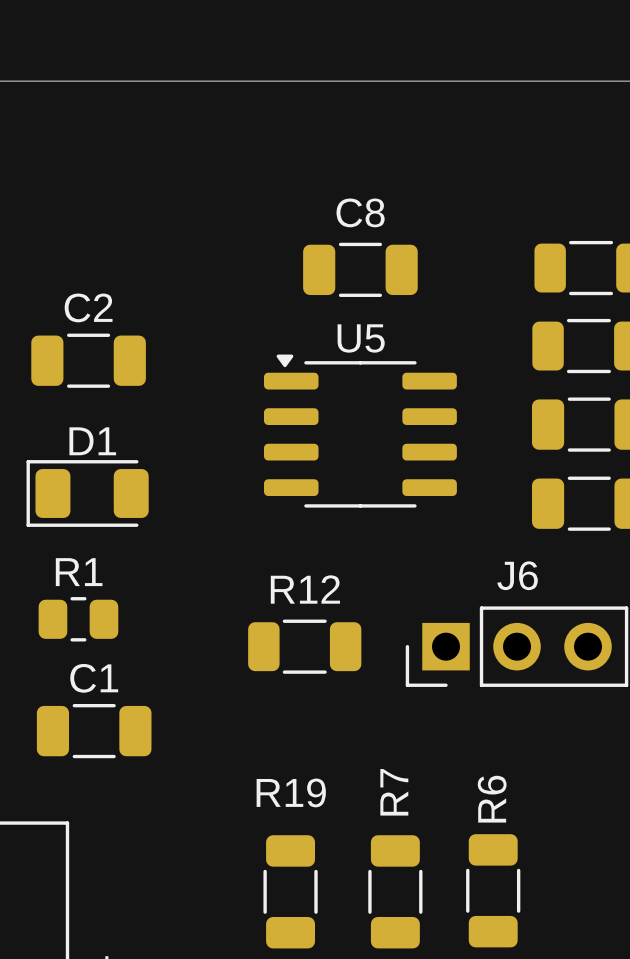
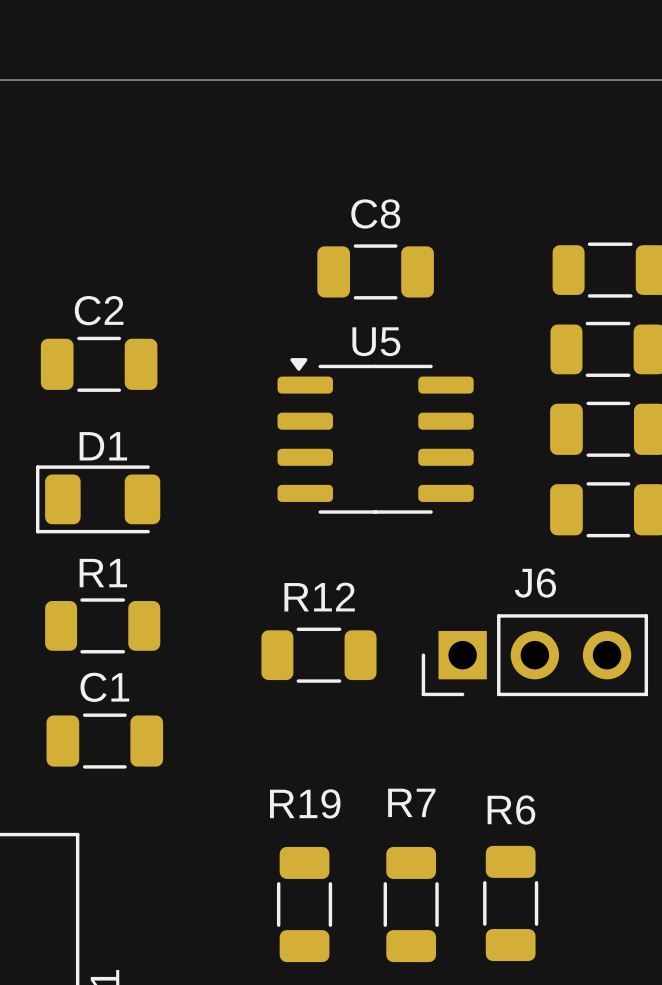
R1 footprint: [38, 597, 119, 642] -> [45, 598, 161, 654]
R7 name rotation: 0° (394, 792) -> 90° clockwise (411, 802)
R6 name rotation: 0° (492, 799) -> 90° clockwise (511, 809)

